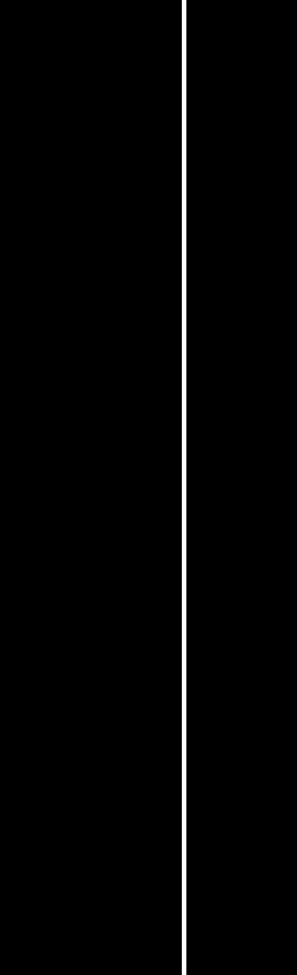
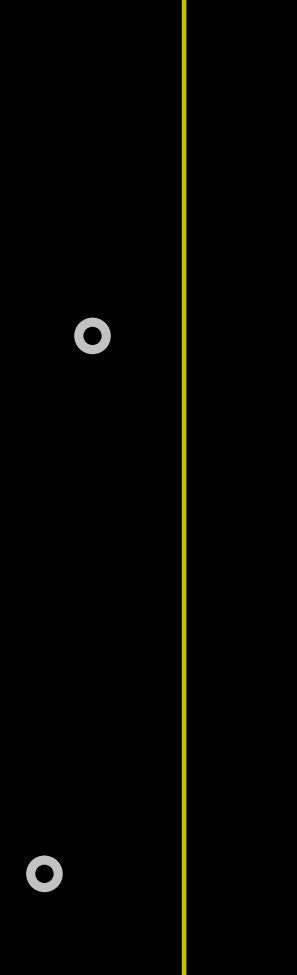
via: none -> (92, 335)
via: none -> (44, 873)

